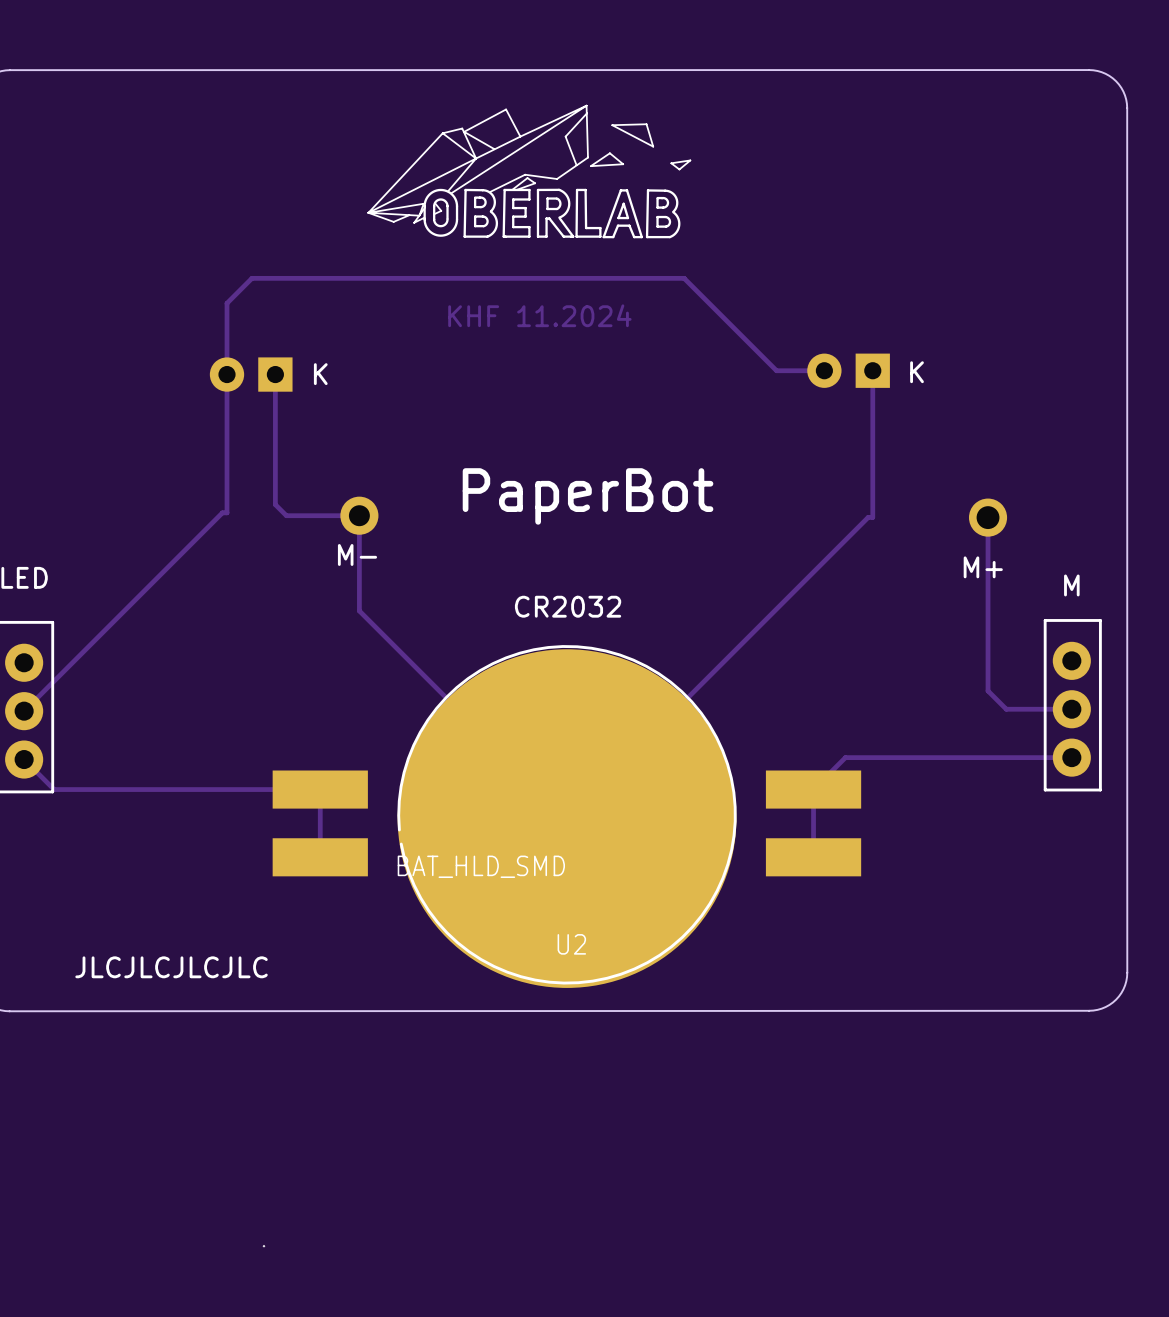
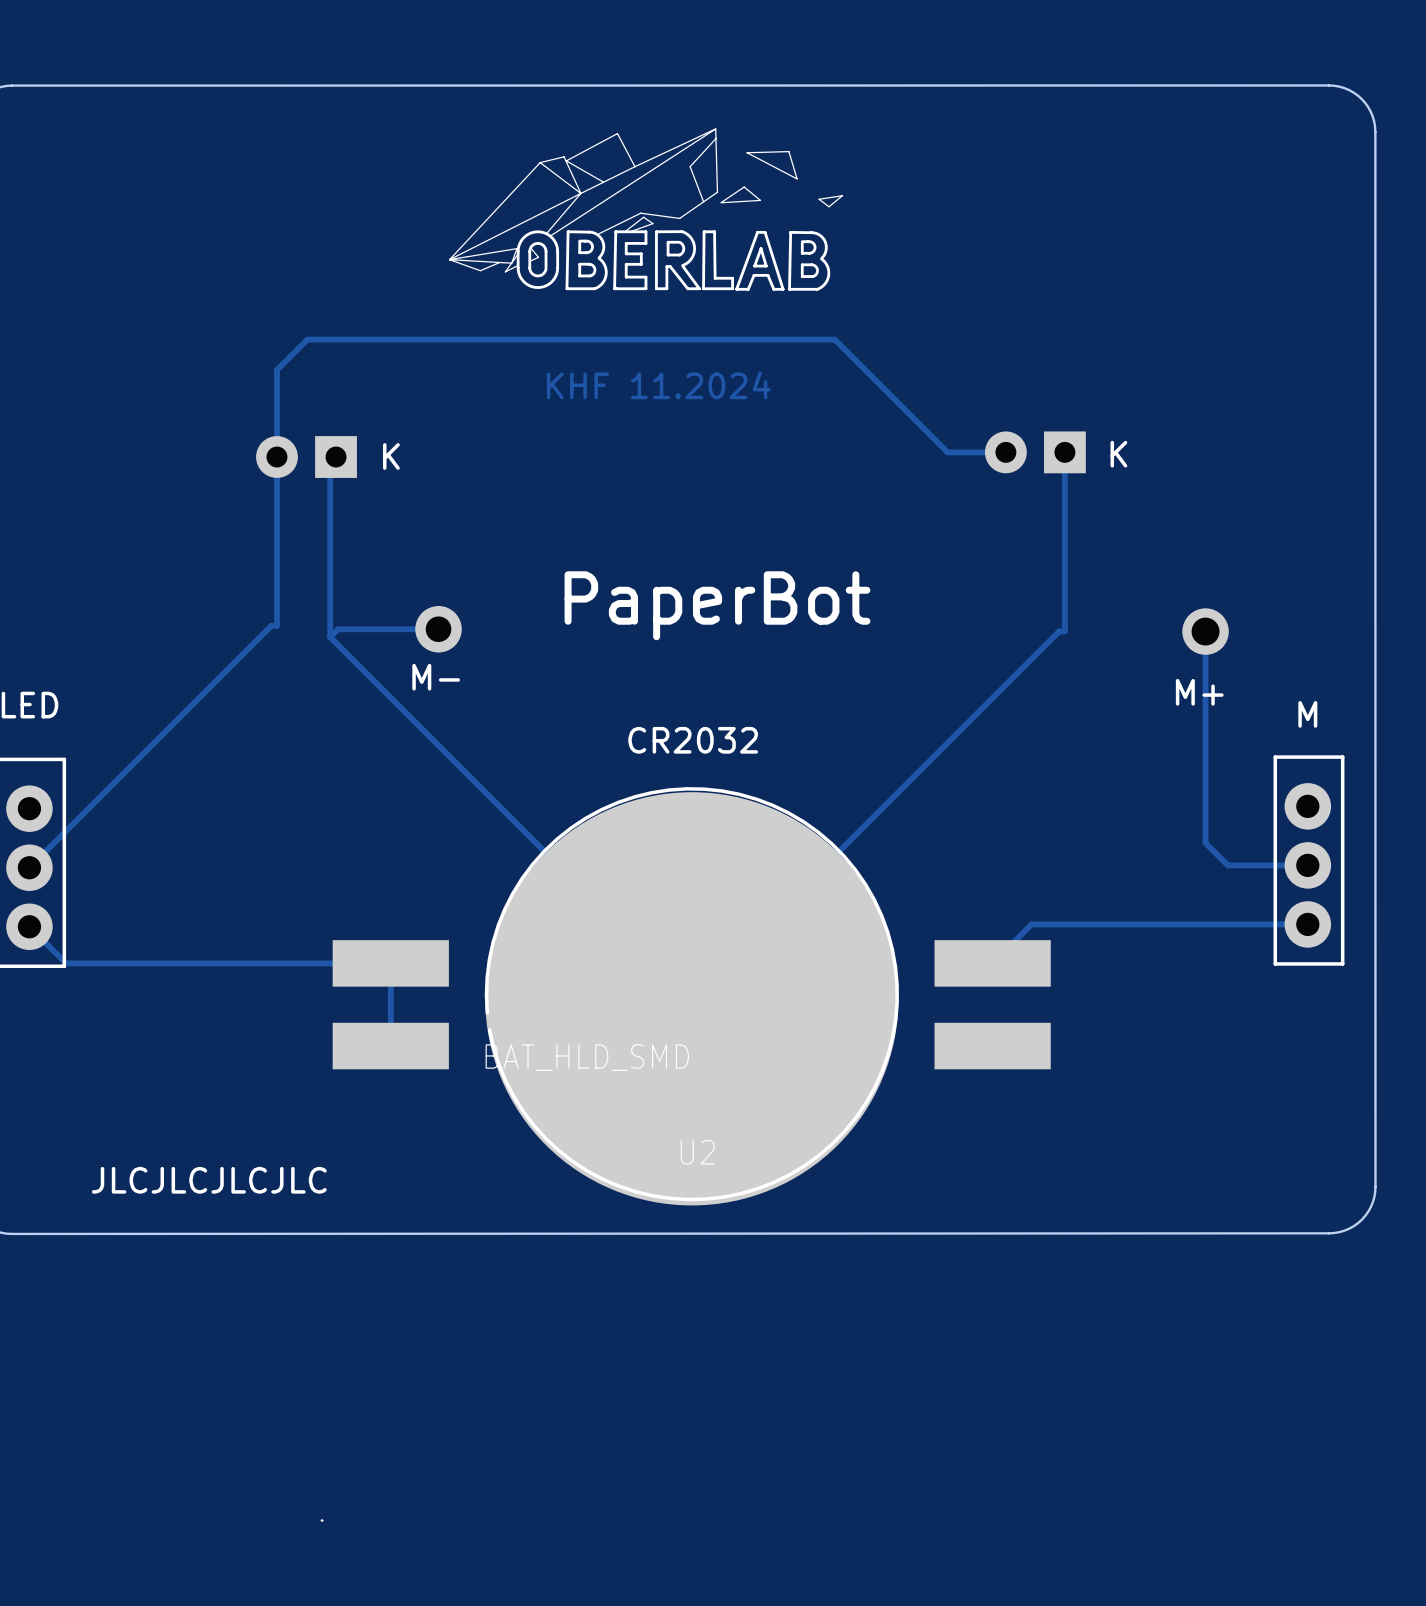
track: none -> (330, 457) (330, 637)
track: (275, 374) (275, 504) (286, 515) -> (330, 637) (338, 629) (349, 629)
track: (359, 515) (359, 610) -> (330, 637) (438, 745)
track: (813, 789) (813, 857) -> none

